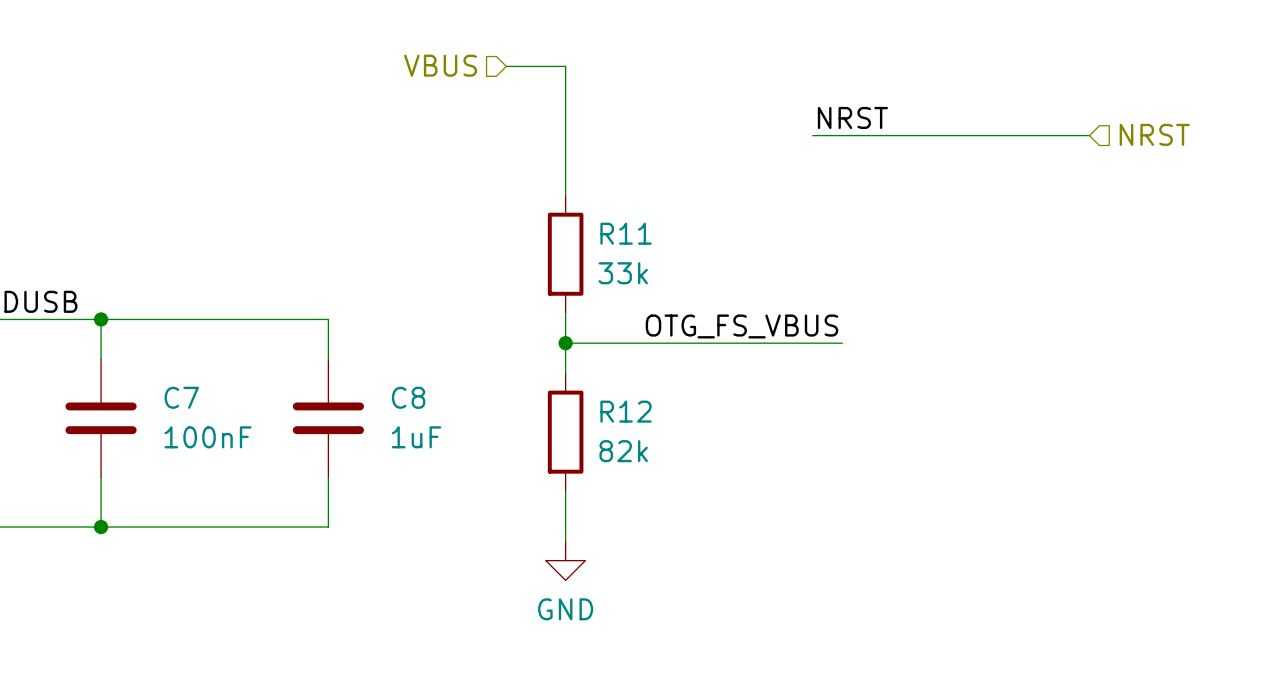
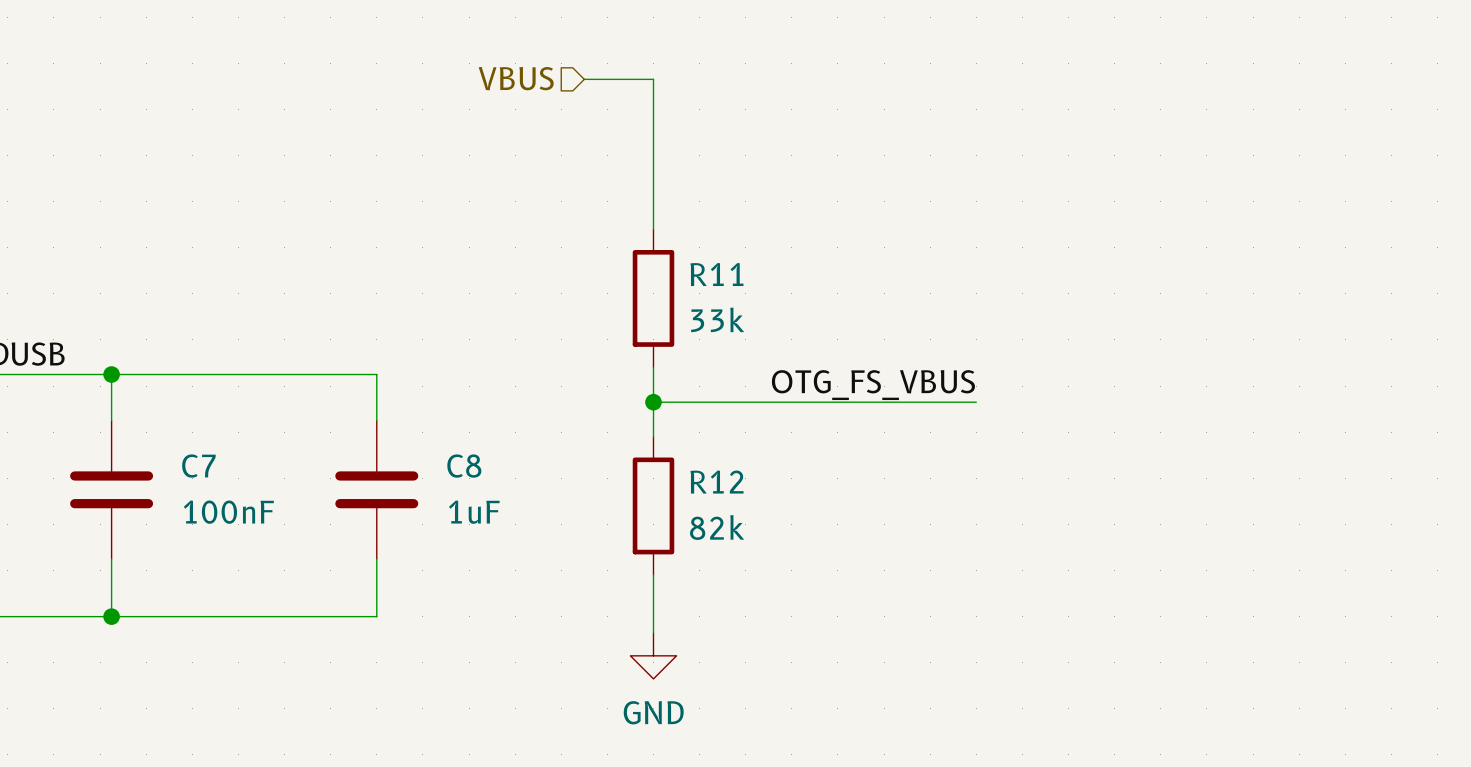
label: NRST (852, 117) -> none
hierarchical label: NRST (1154, 134) -> none
wire: (812, 135) (1089, 135) -> none

